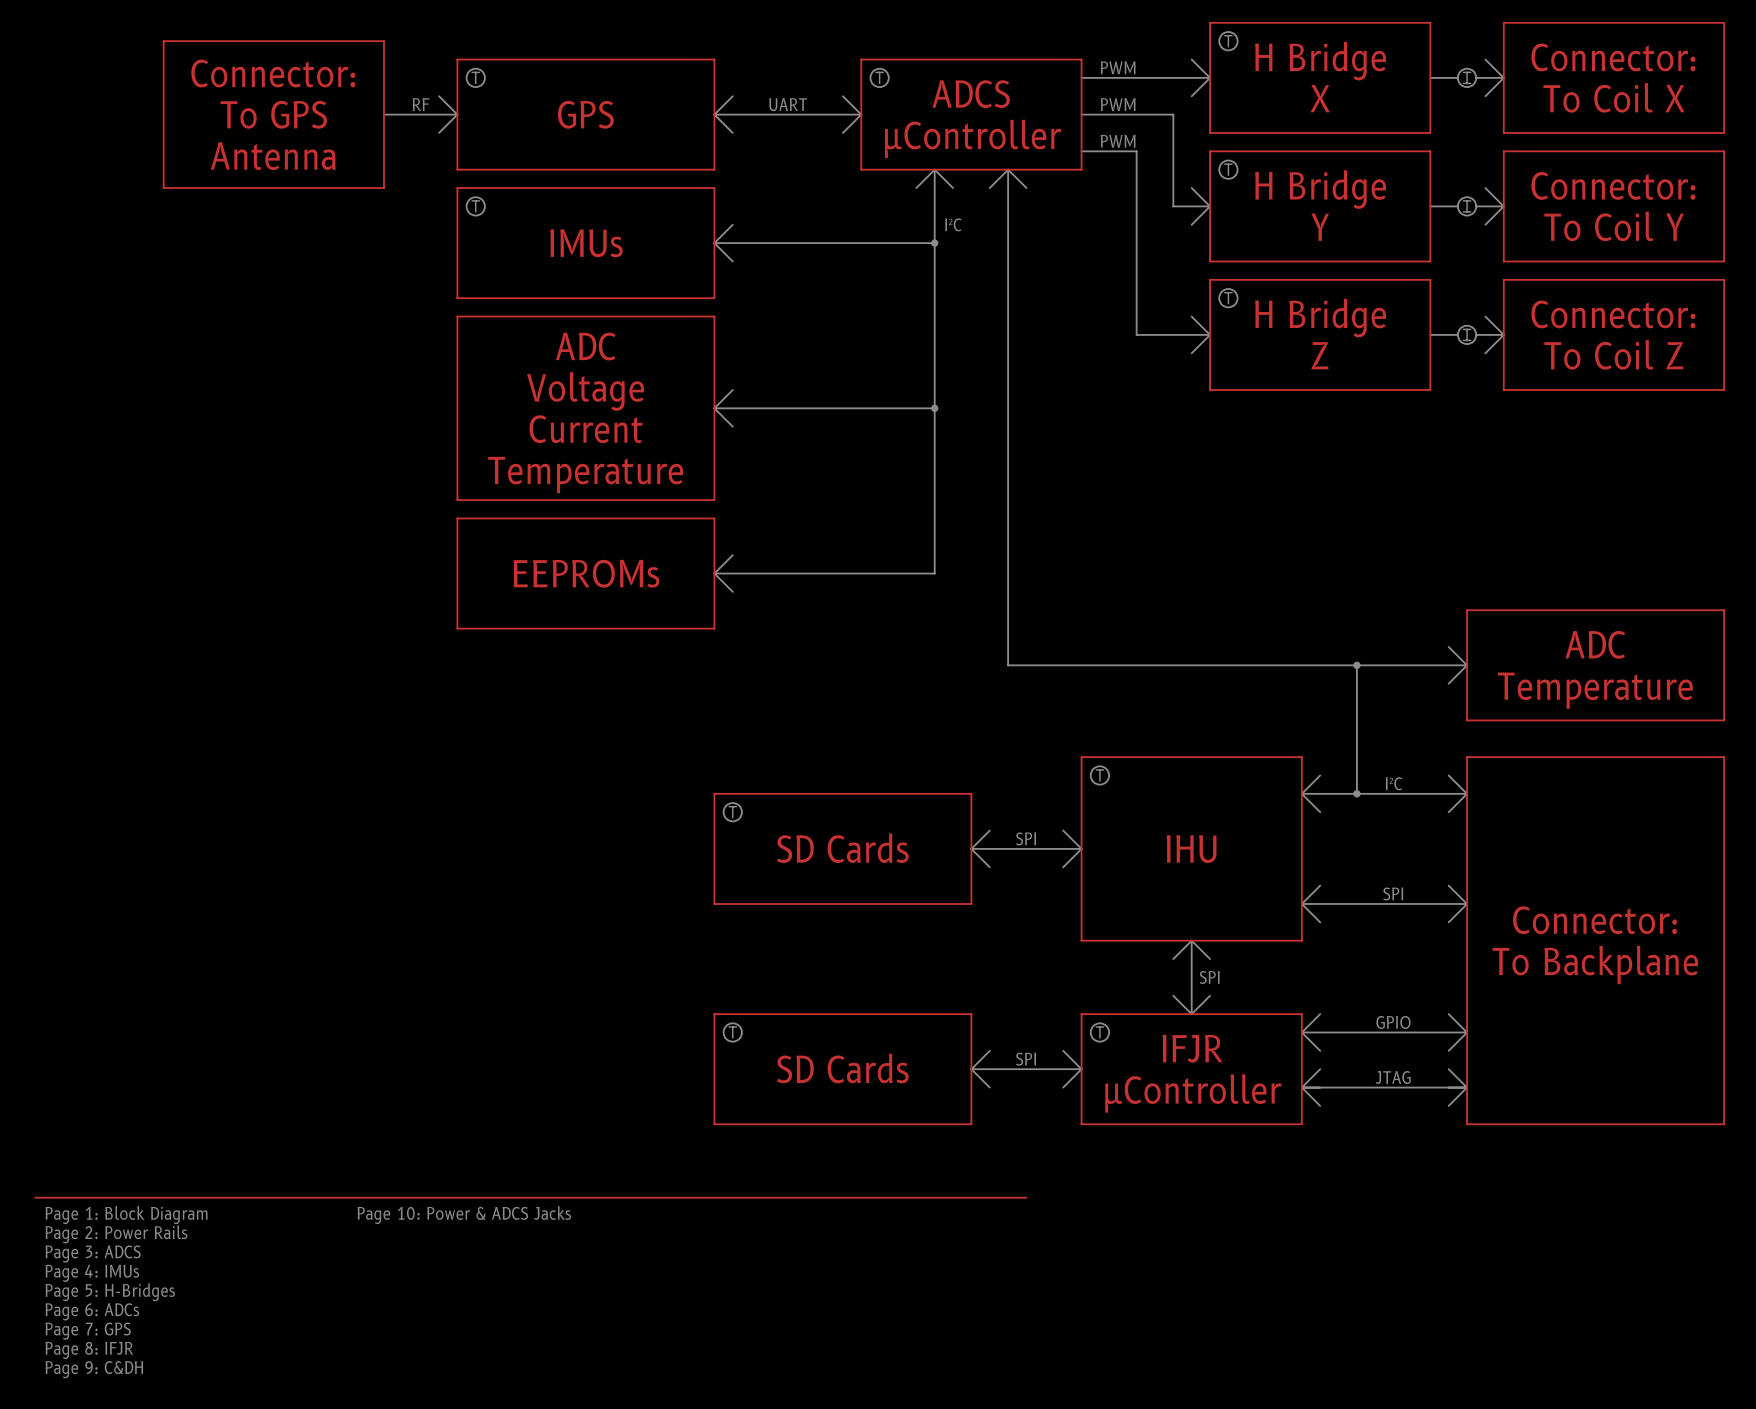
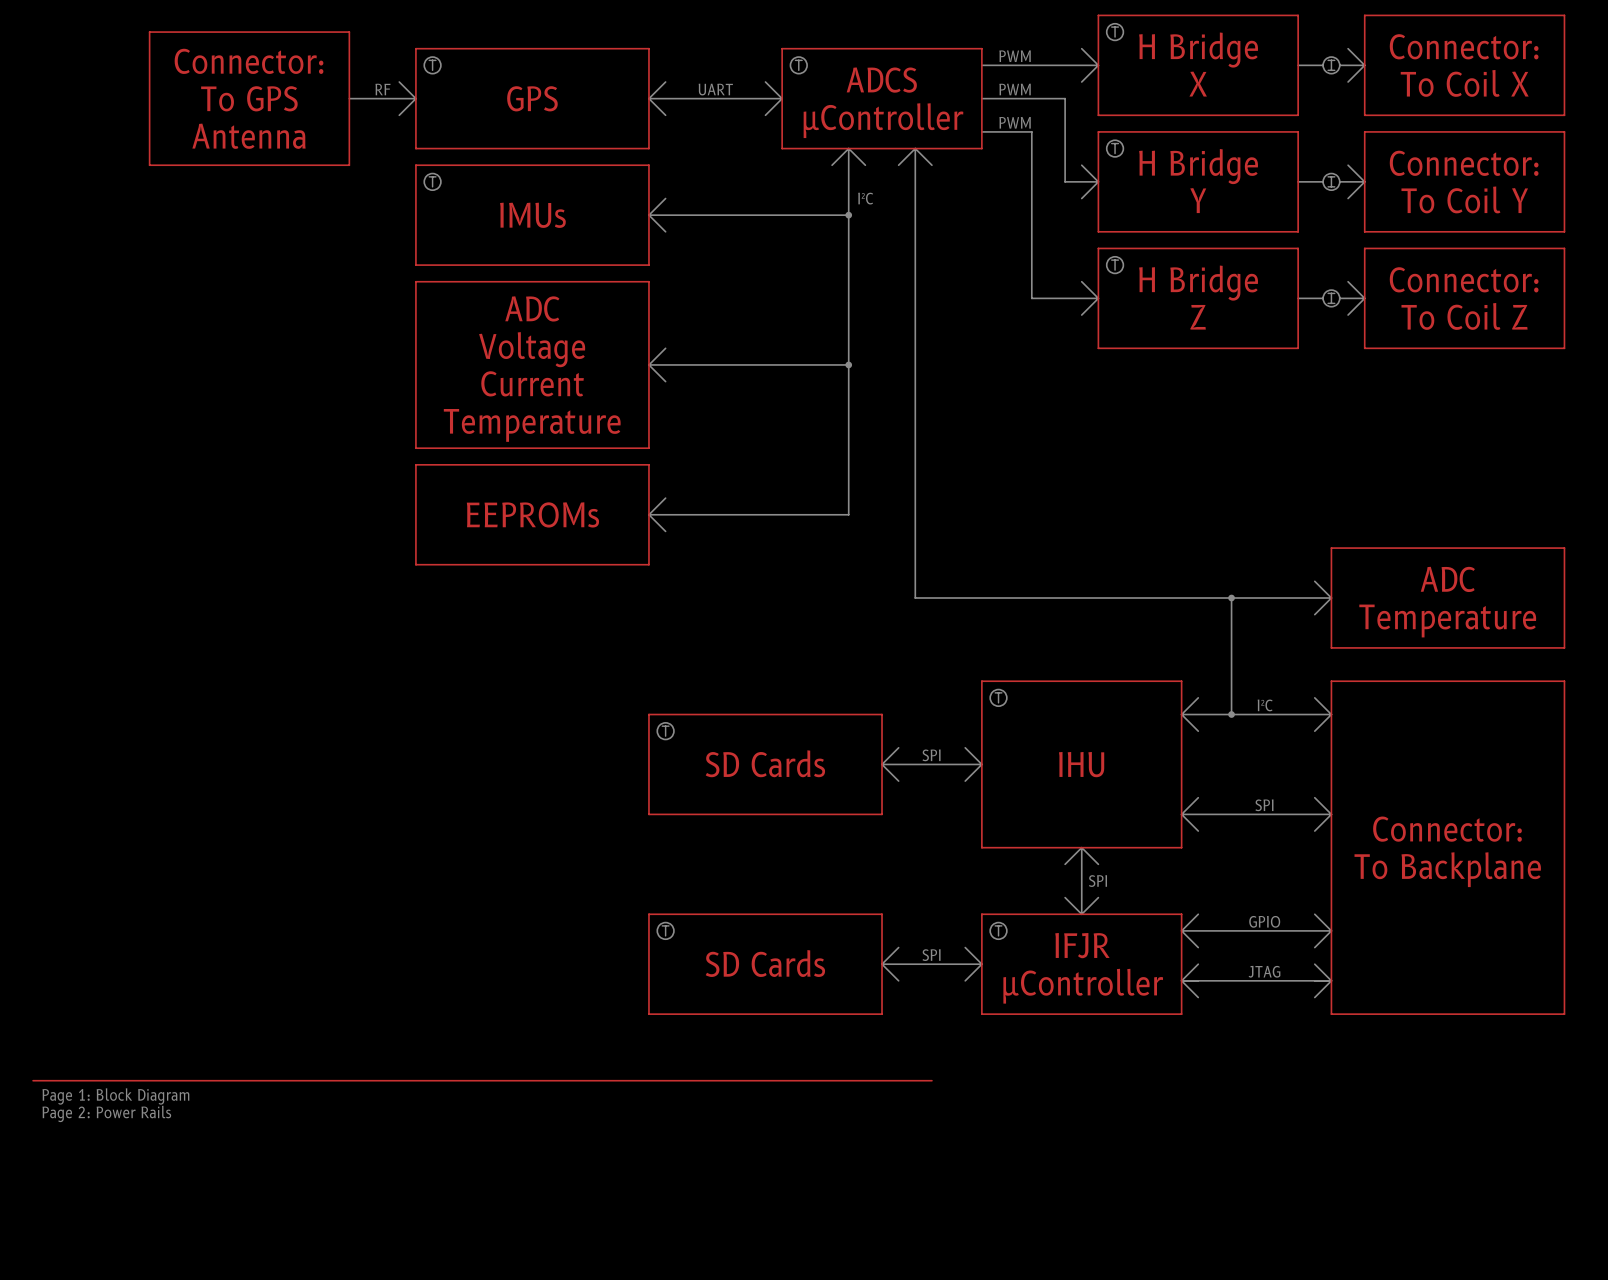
text: Page 10: Power & ADCS Jacks (464, 1215) -> none
text: Page 3: ADCS (93, 1254) -> none
text: Page 4: IMUs (92, 1273) -> none
text: Page 5: H-Bridges (110, 1292) -> none
text: Page 6: ADCs (92, 1311) -> none
text: Page 7: GPS (88, 1331) -> none
text: Page 8: IFJR (89, 1350) -> none
text: Page 9: C&DH (94, 1369) -> none

